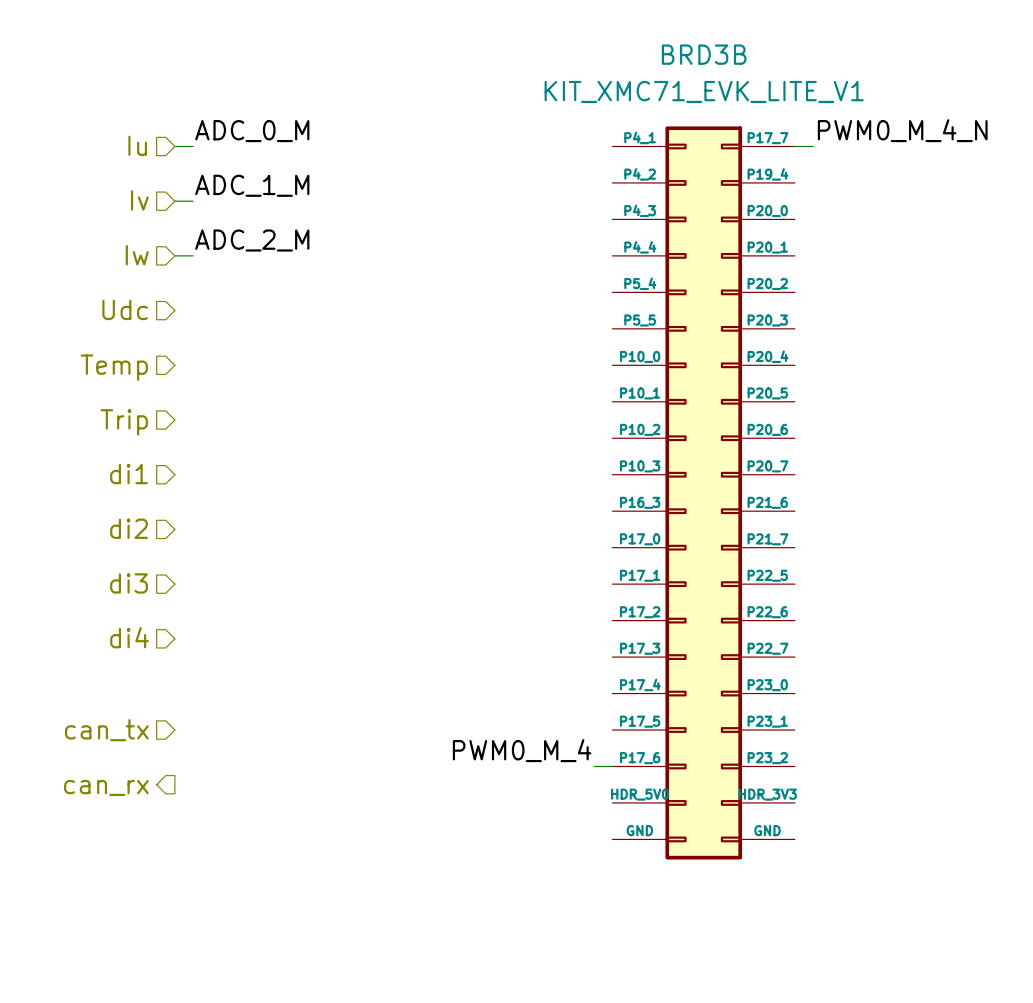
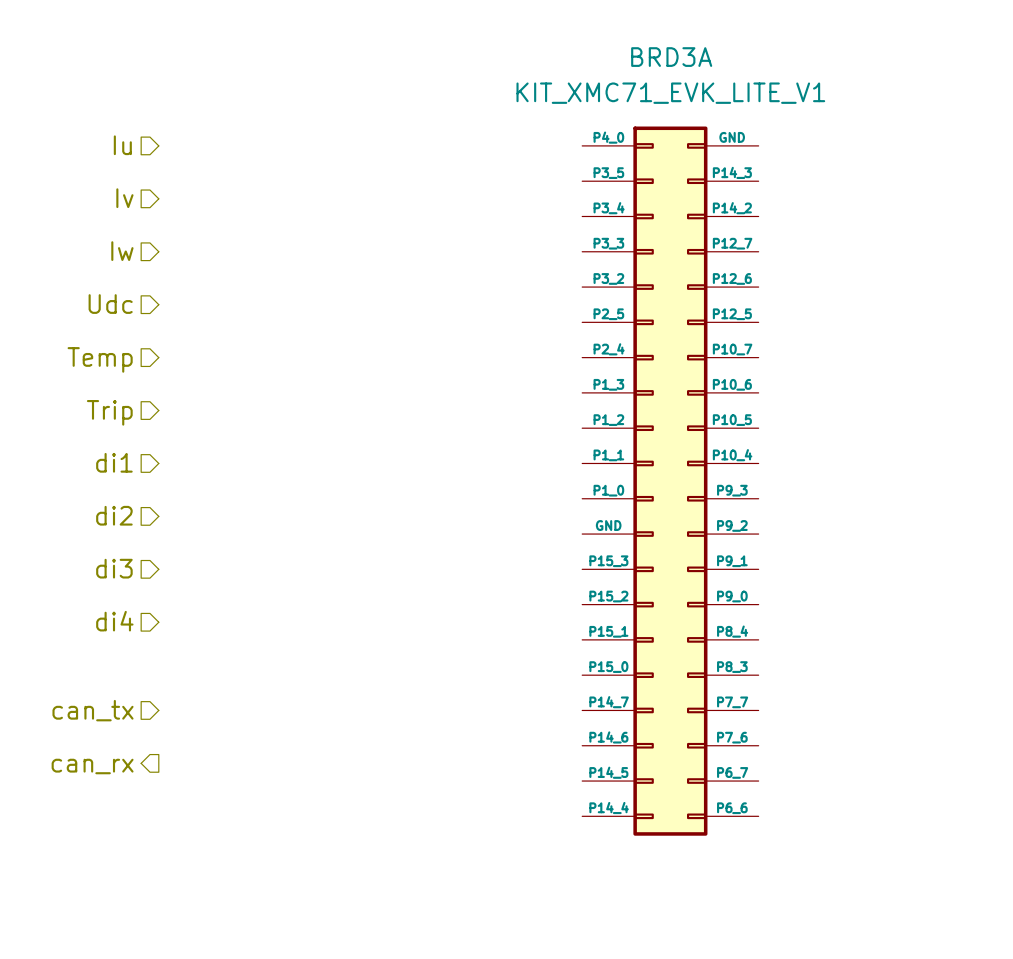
BRD3B name: BRD3B (704, 54) -> BRD3A (671, 57)
BRD3B symbol: [612, 126, 795, 860] -> [582, 126, 759, 836]
label: PWM0_M_4_N (902, 130) -> none
label: ADC_0_M (252, 131) -> none
wire: (174, 146) (193, 146) -> none
wire: (794, 146) (813, 146) -> none
label: ADC_1_M (252, 185) -> none
wire: (174, 201) (193, 201) -> none
label: ADC_2_M (252, 240) -> none
wire: (174, 255) (193, 255) -> none
label: PWM0_M_4 (522, 750) -> none
wire: (594, 766) (612, 766) -> none

